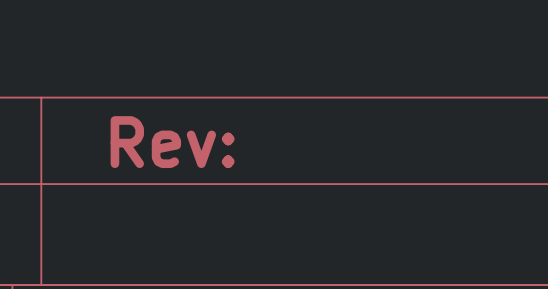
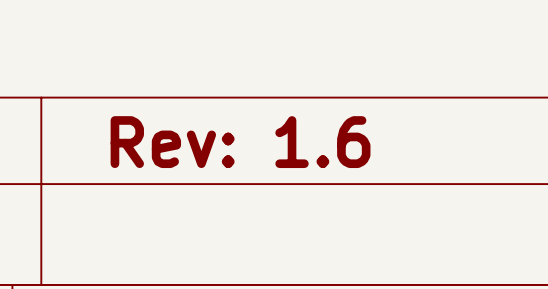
title block: Rev: (172, 142) -> Rev: 1.6 (240, 142)

